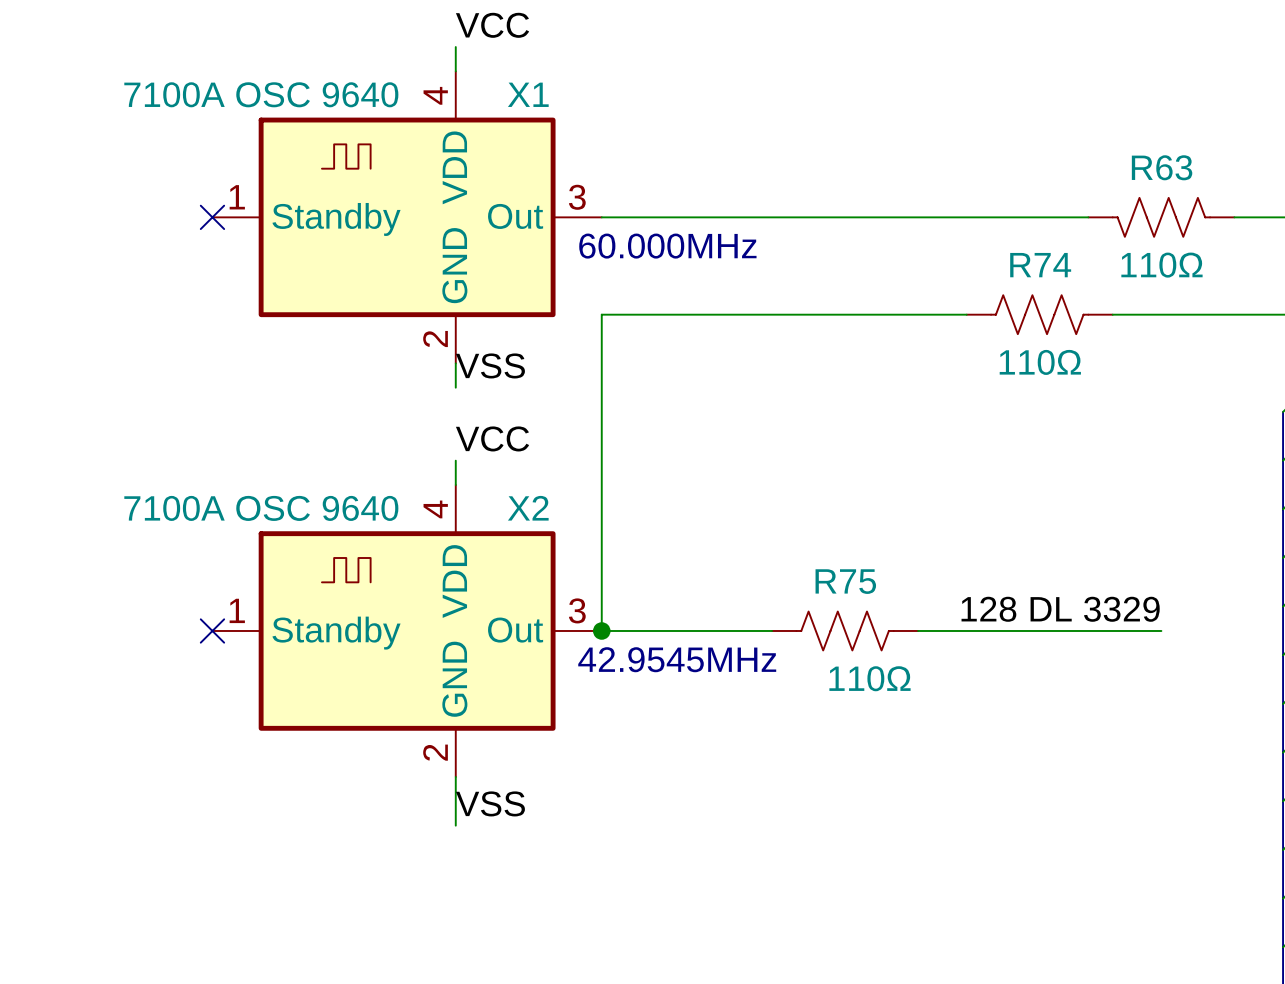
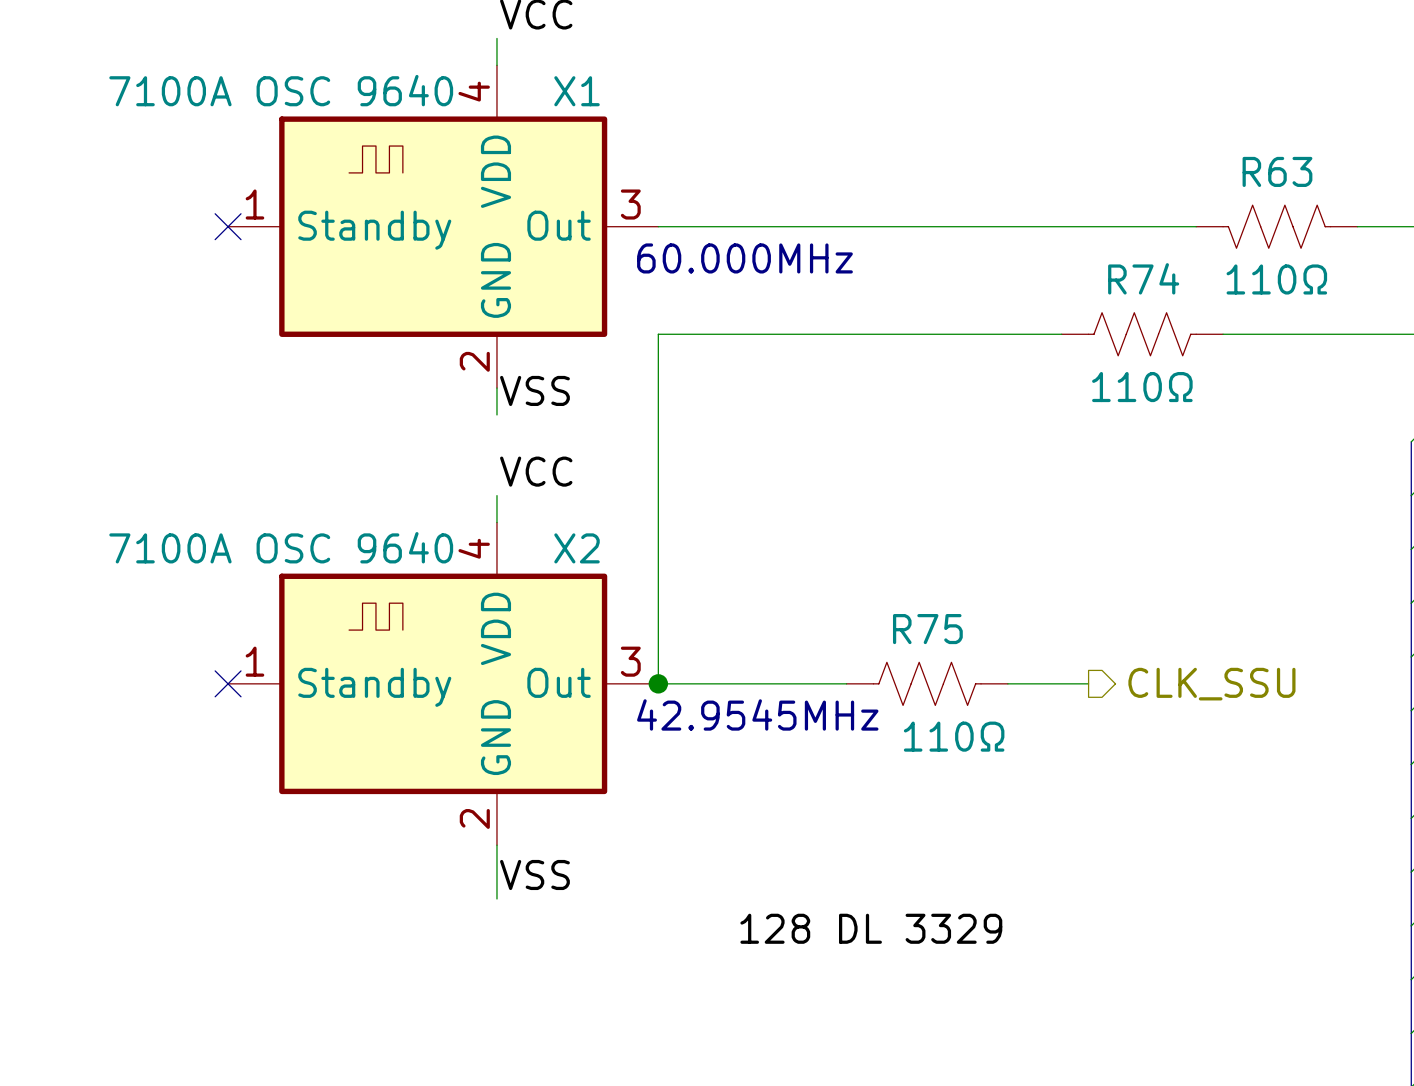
label position: 128 DL 3329 (1060, 609) -> 128 DL 3329 (871, 928)
wire: (991, 630) (1161, 630) -> none
hierarchical label: none -> CLK_SSU (1211, 684)

